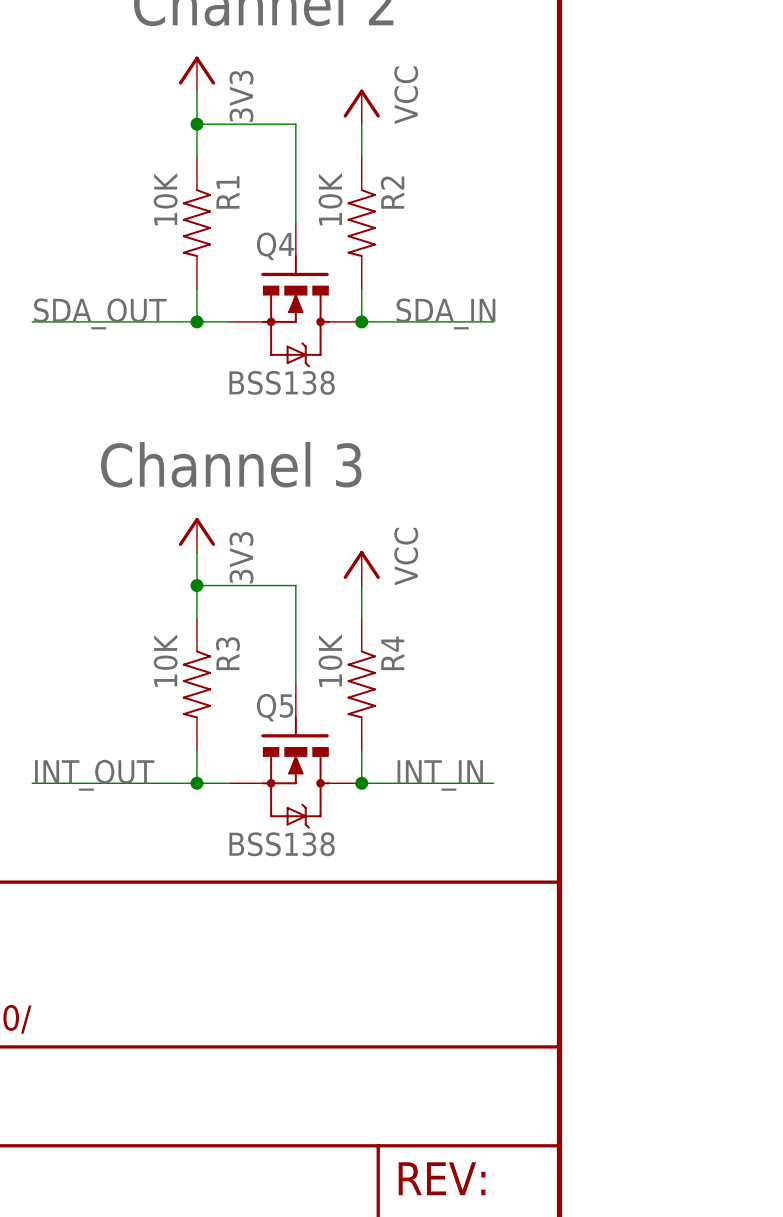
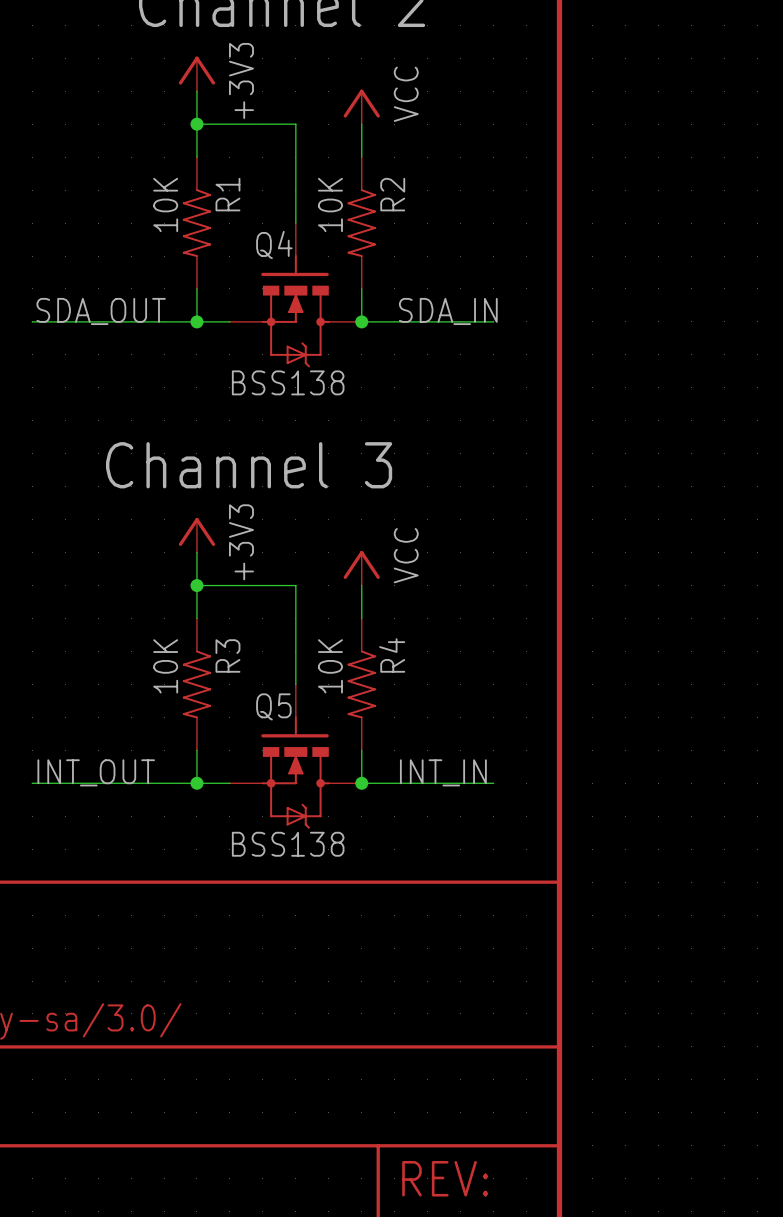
power symbol: 3V3 (196, 73) -> +3V3 (196, 73)
power symbol: 3V3 (196, 535) -> +3V3 (196, 535)

